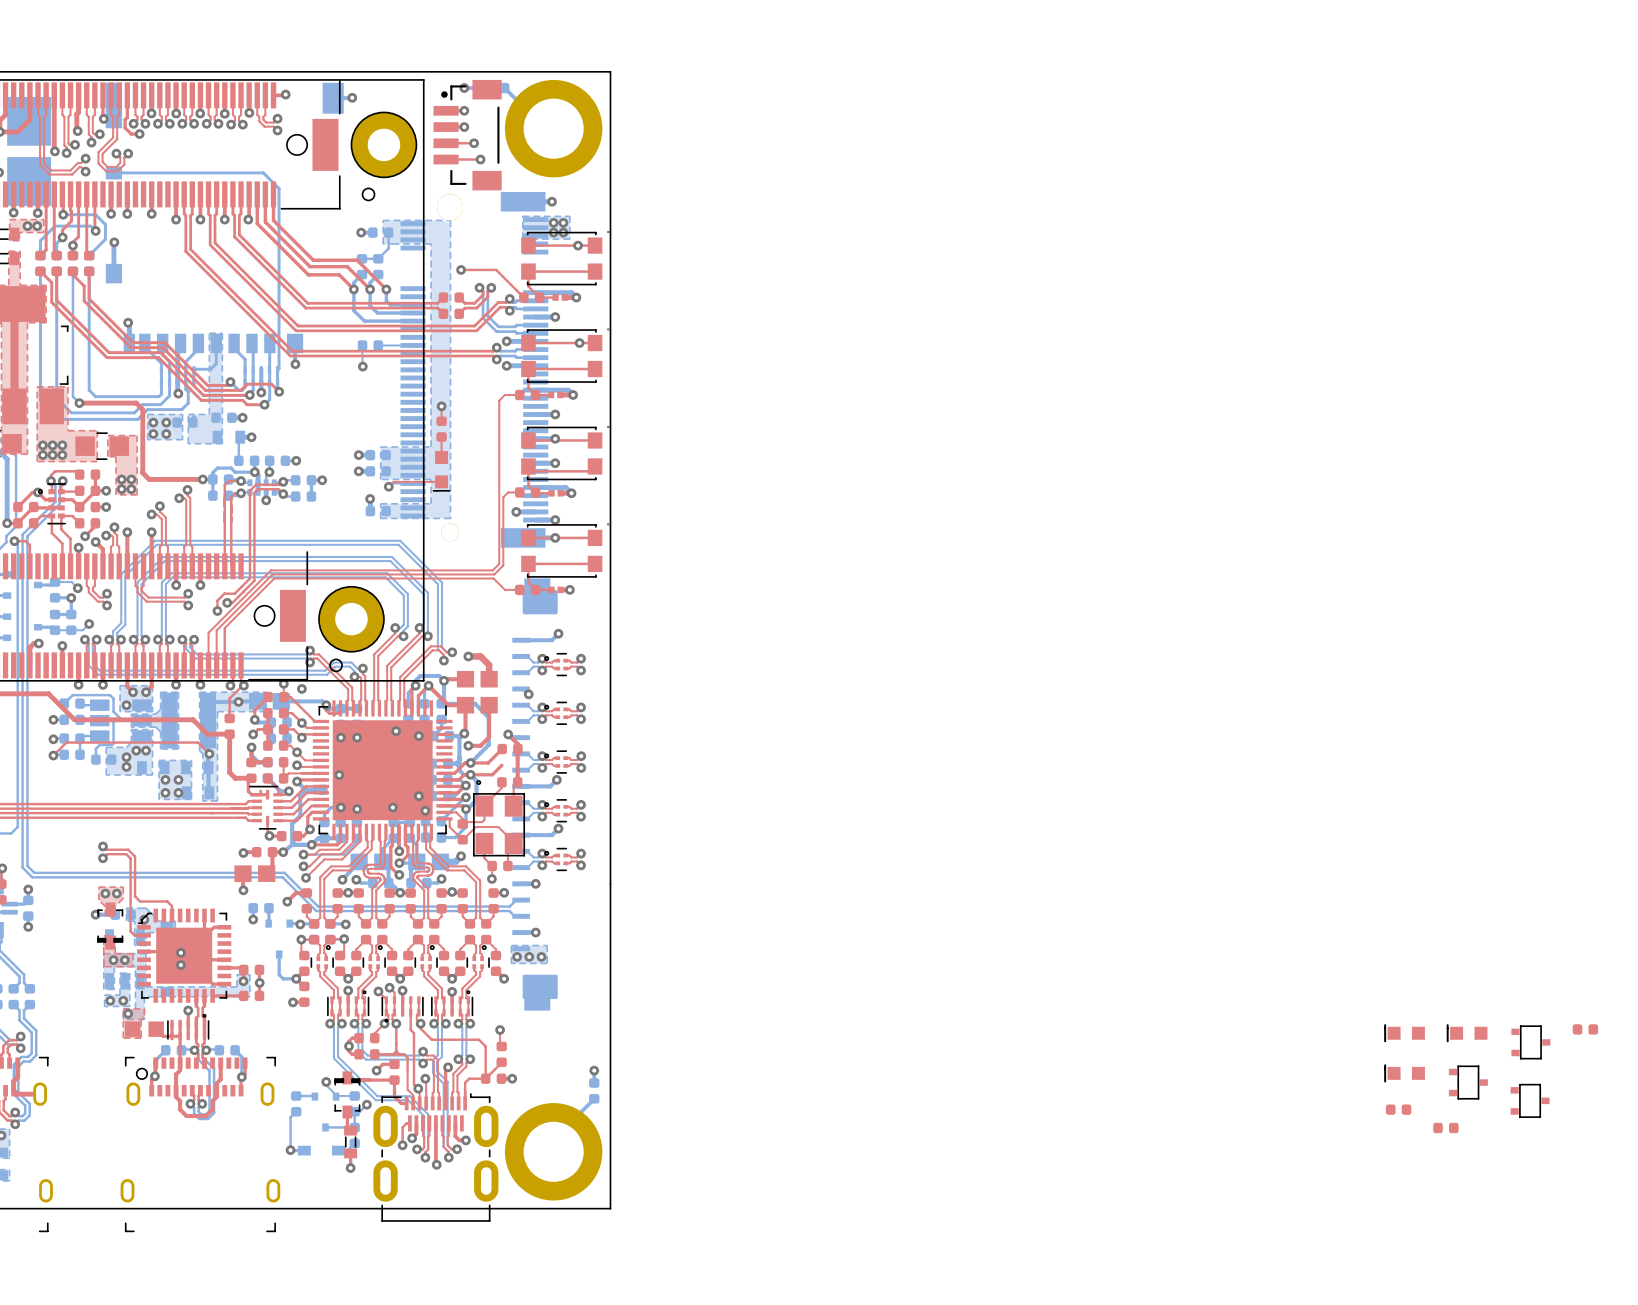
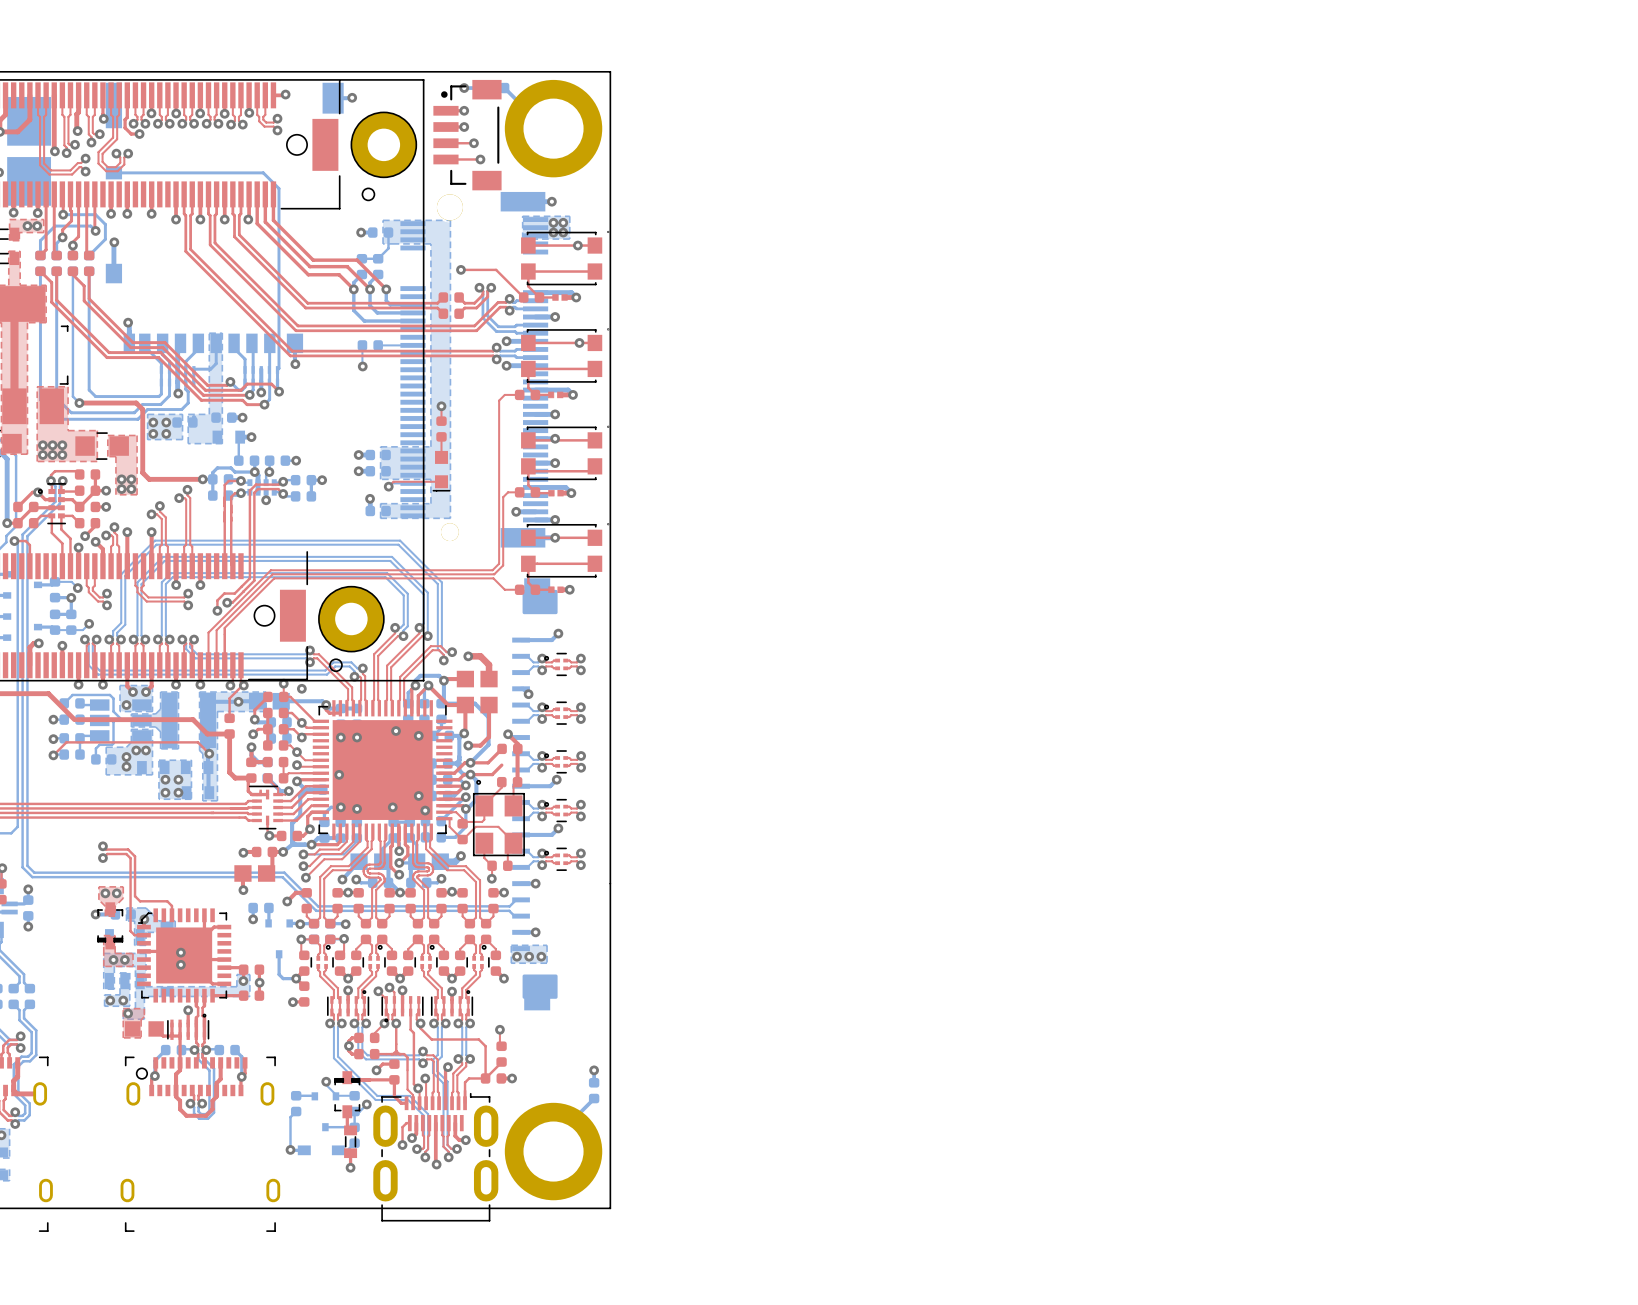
part: (1585, 1029) -> none
part: (1404, 1033) -> none
part: (1467, 1033) -> none
part: (1530, 1042) -> none
part: (1404, 1073) -> none
part: (1468, 1082) -> none
part: (1530, 1100) -> none
part: (1398, 1109) -> none
part: (1445, 1128) -> none

